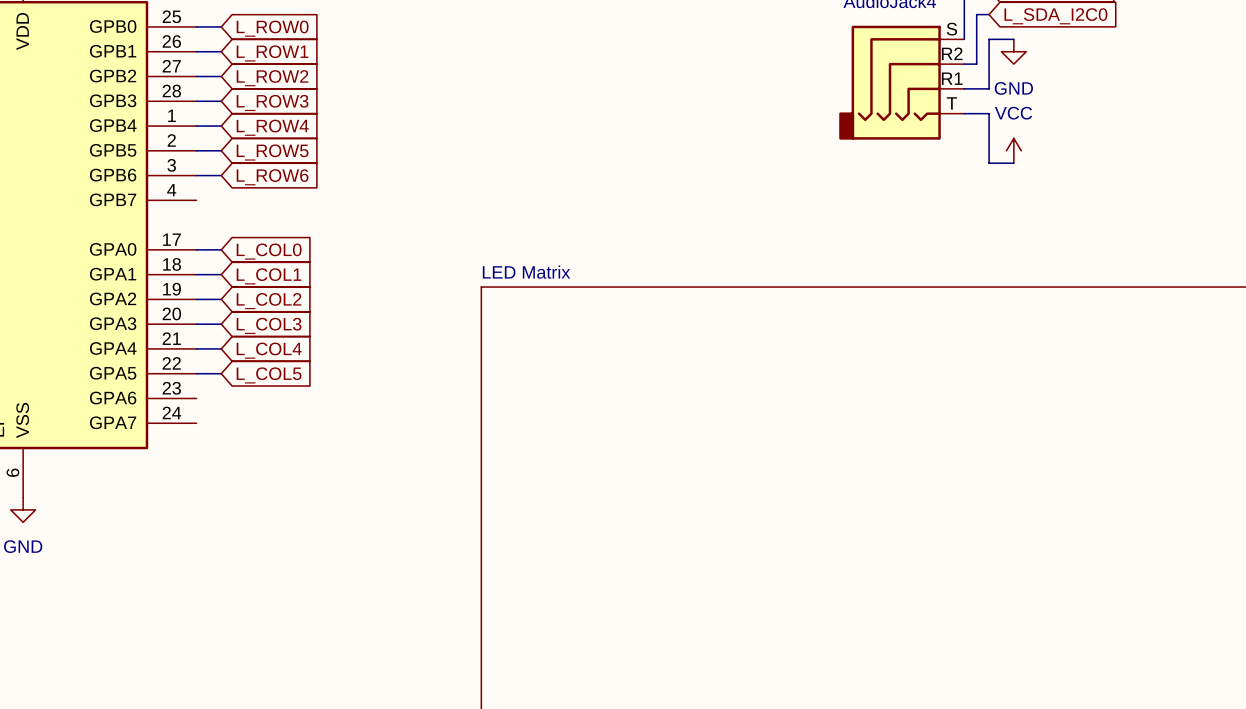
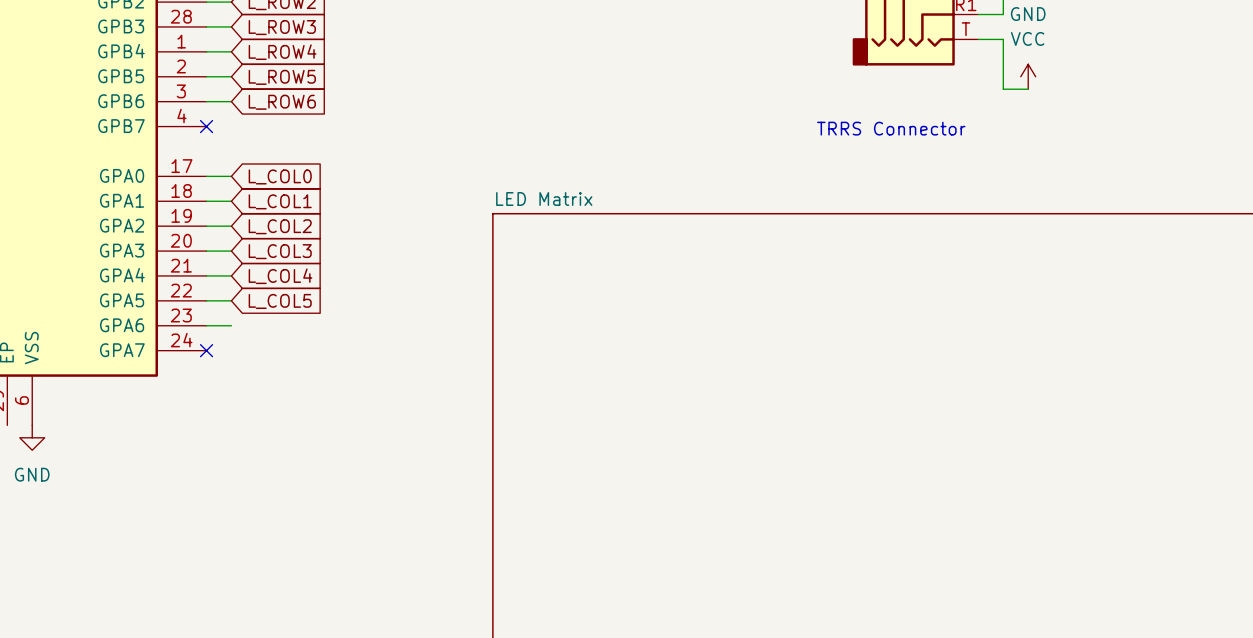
no-connect mark: none -> (206, 126)
text: none -> TRRS Connector (891, 128)
wire: none -> (206, 325) (231, 325)
no-connect mark: none -> (206, 350)

